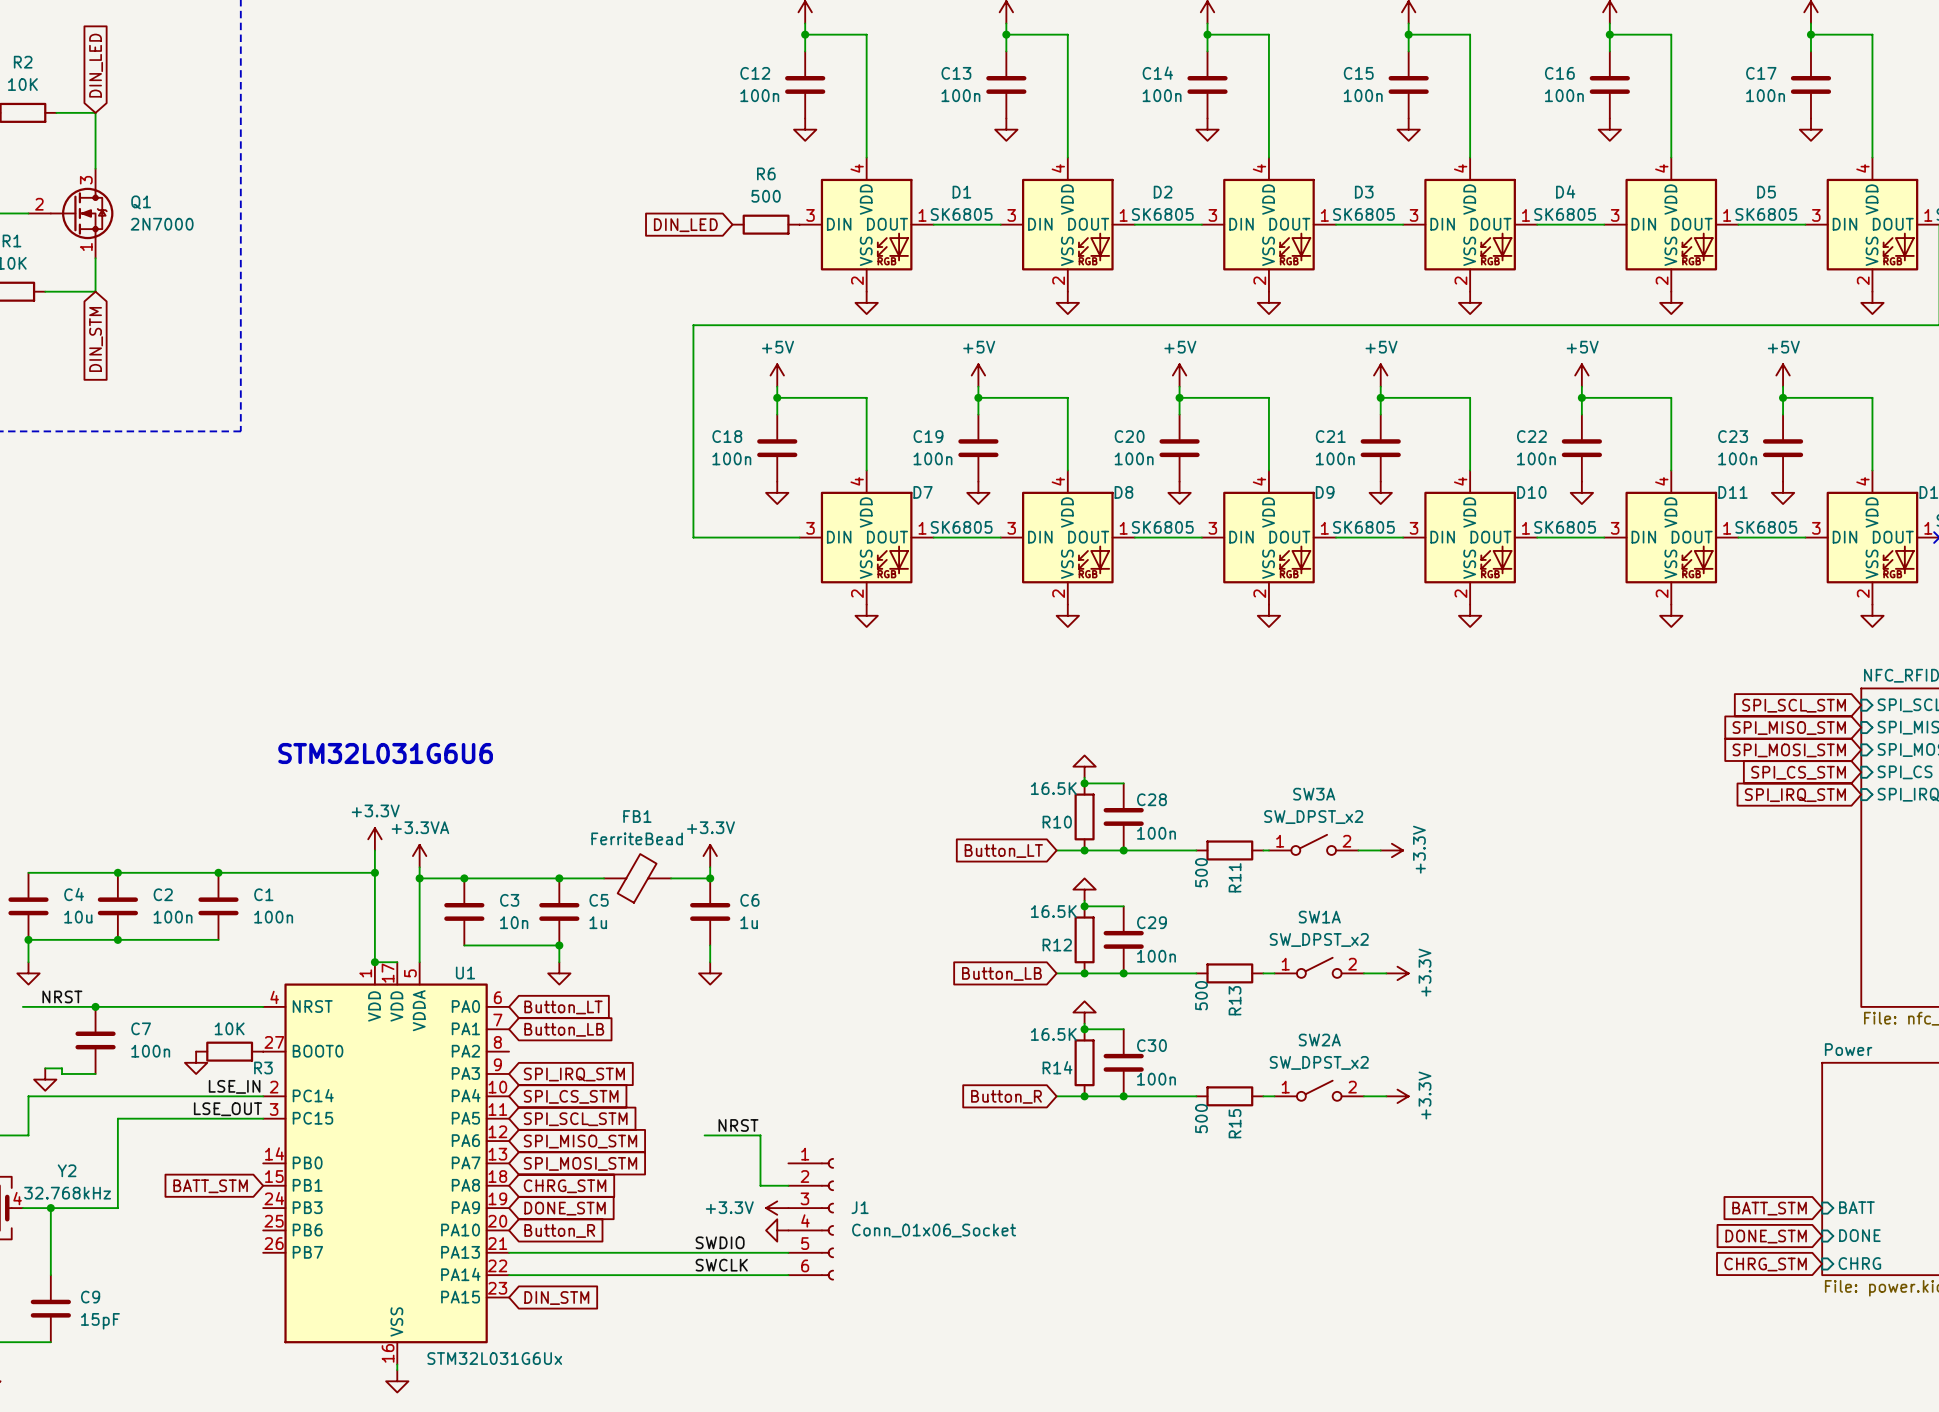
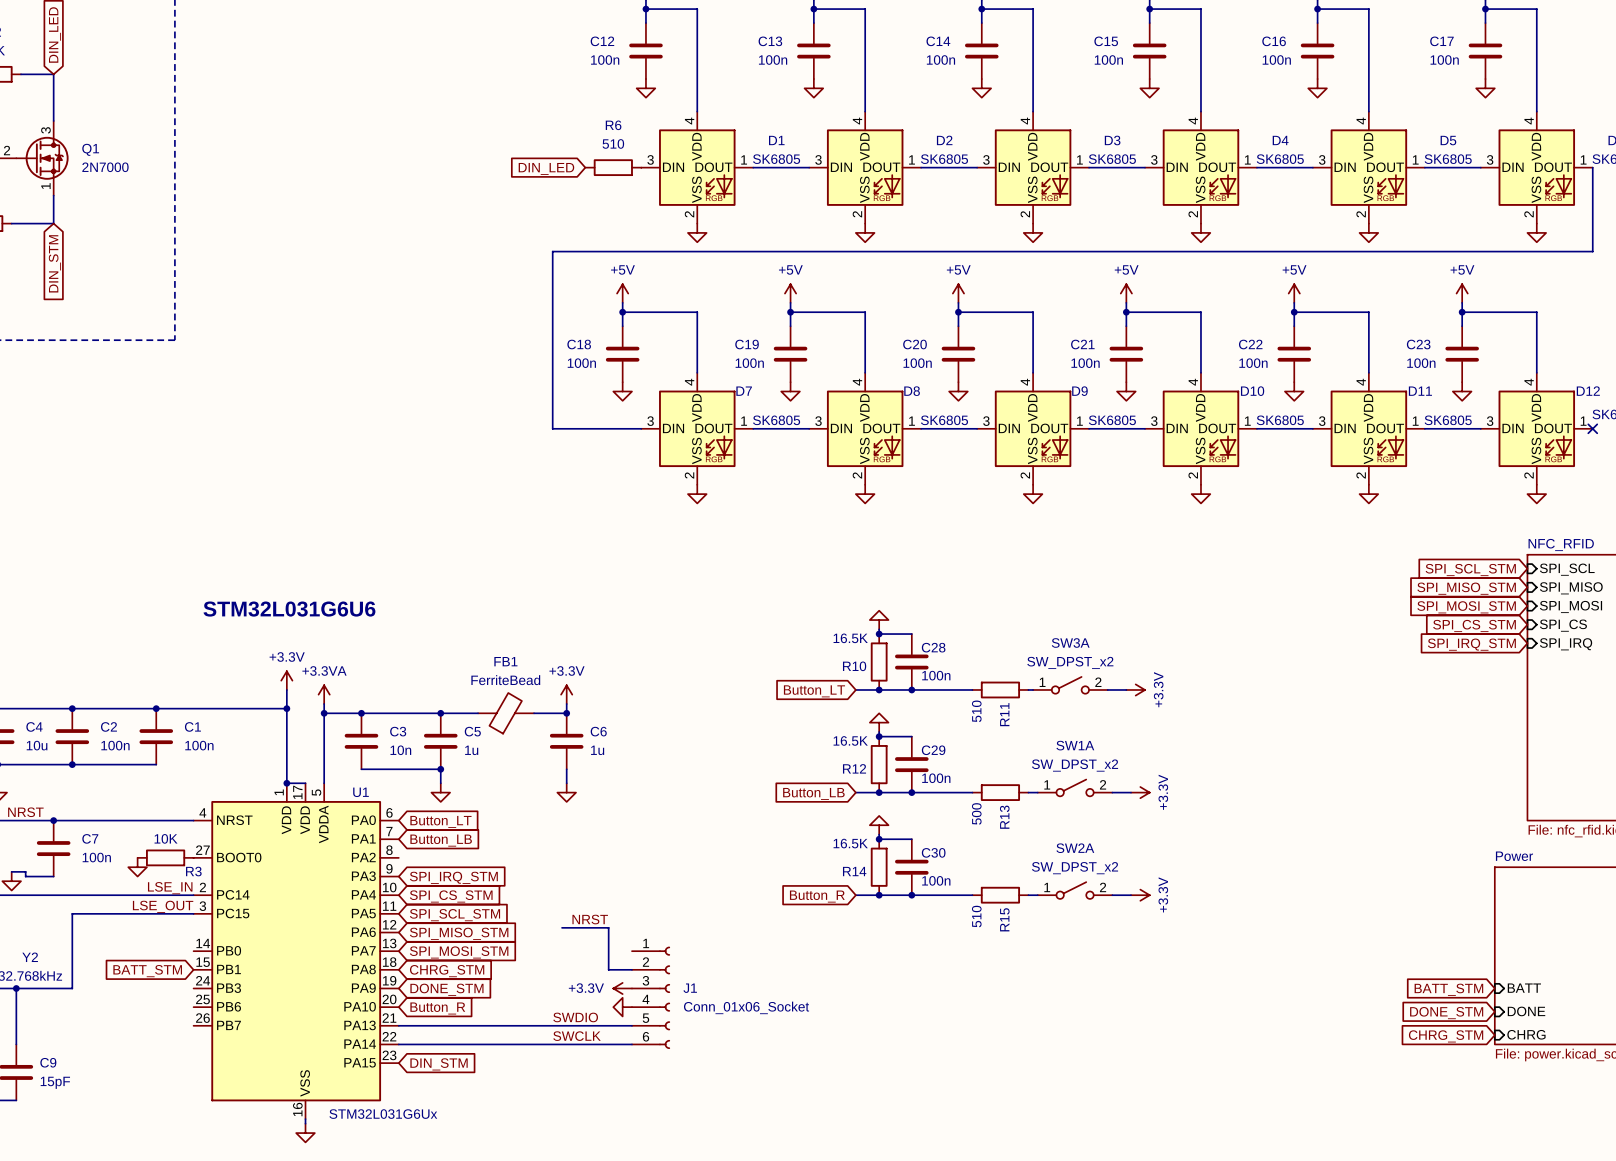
R6 value: 500 (766, 196) -> 510 (613, 143)
R11 value: 500 (1201, 872) -> 510 (976, 711)
R15 value: 500 (1201, 1118) -> 510 (976, 916)

